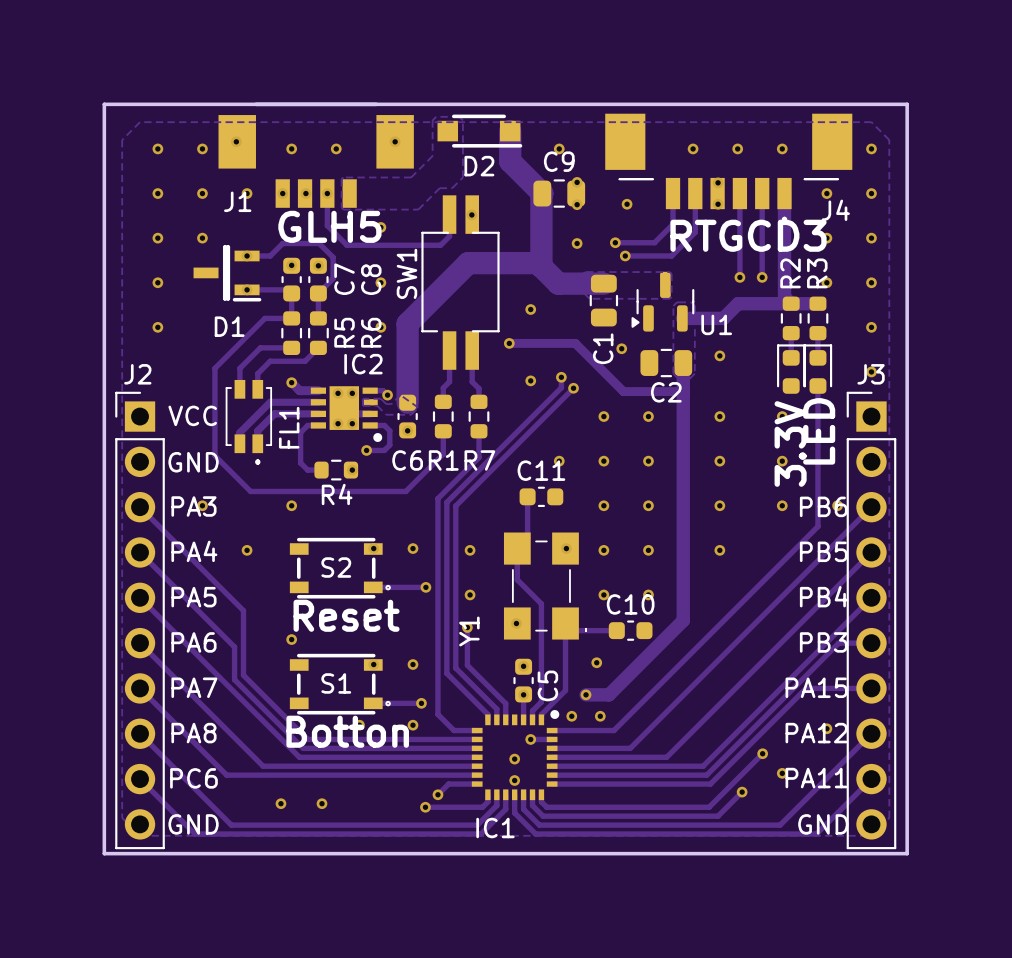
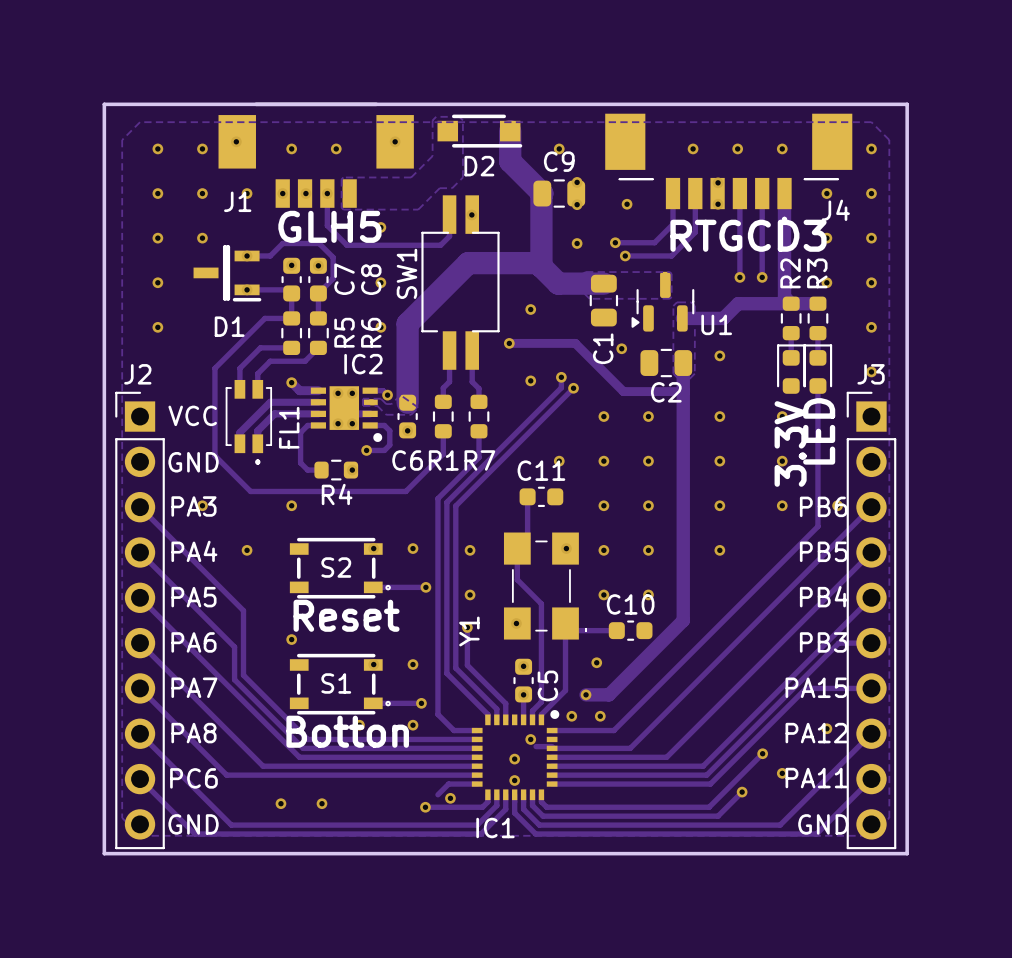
track: (530, 739) (552, 739) -> none
track: none -> (536, 746) (552, 746)
via position: (437, 794) -> (450, 798)

